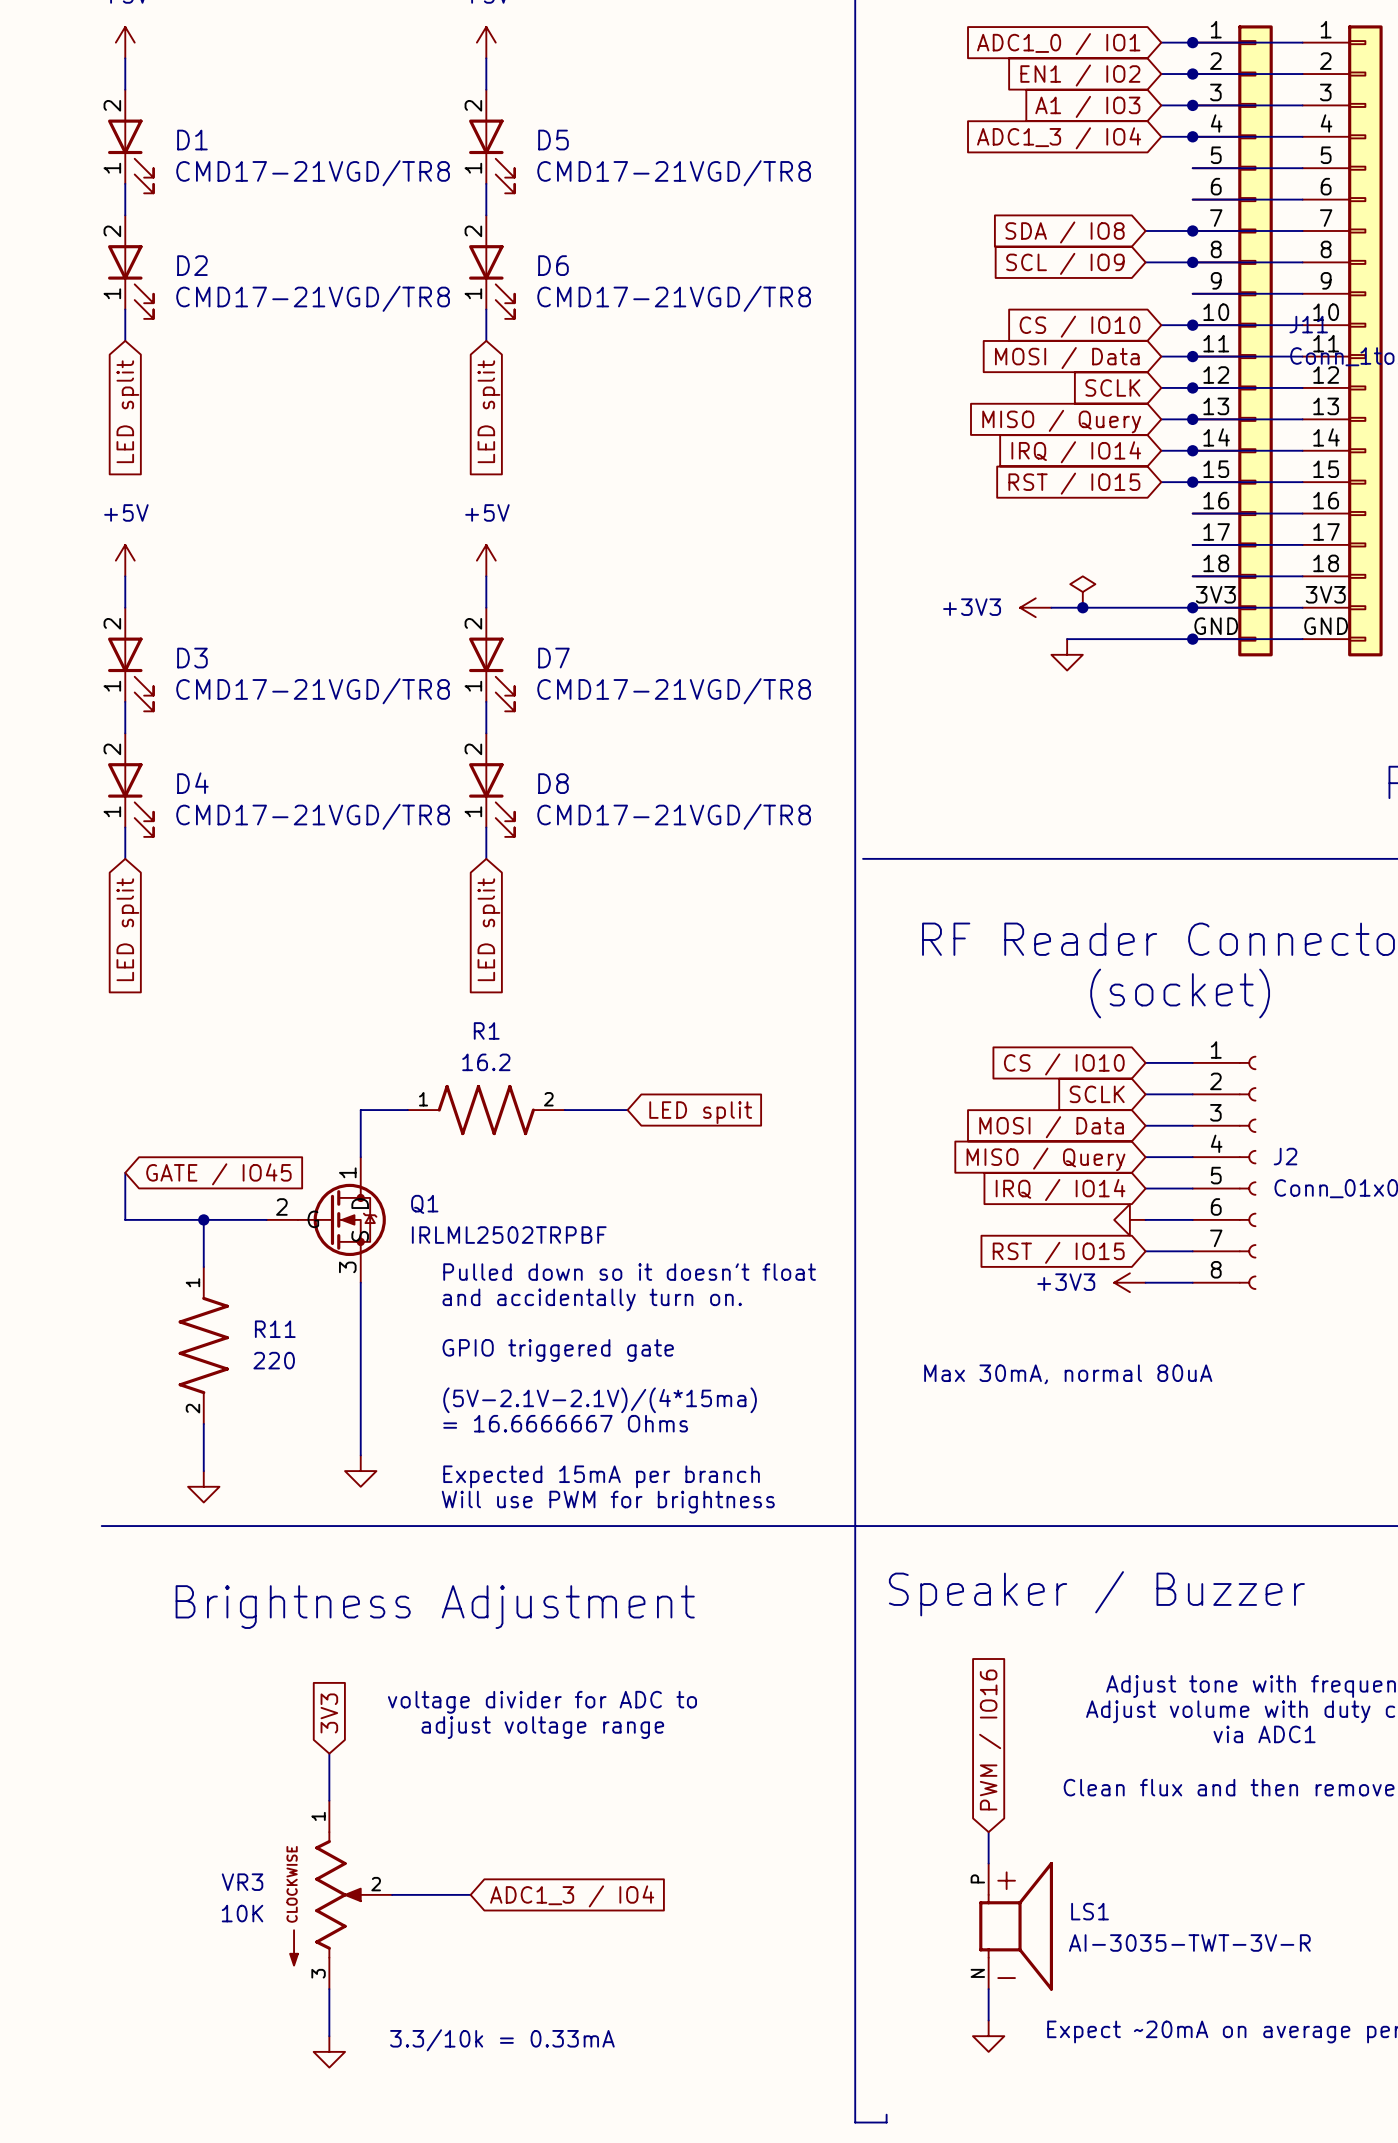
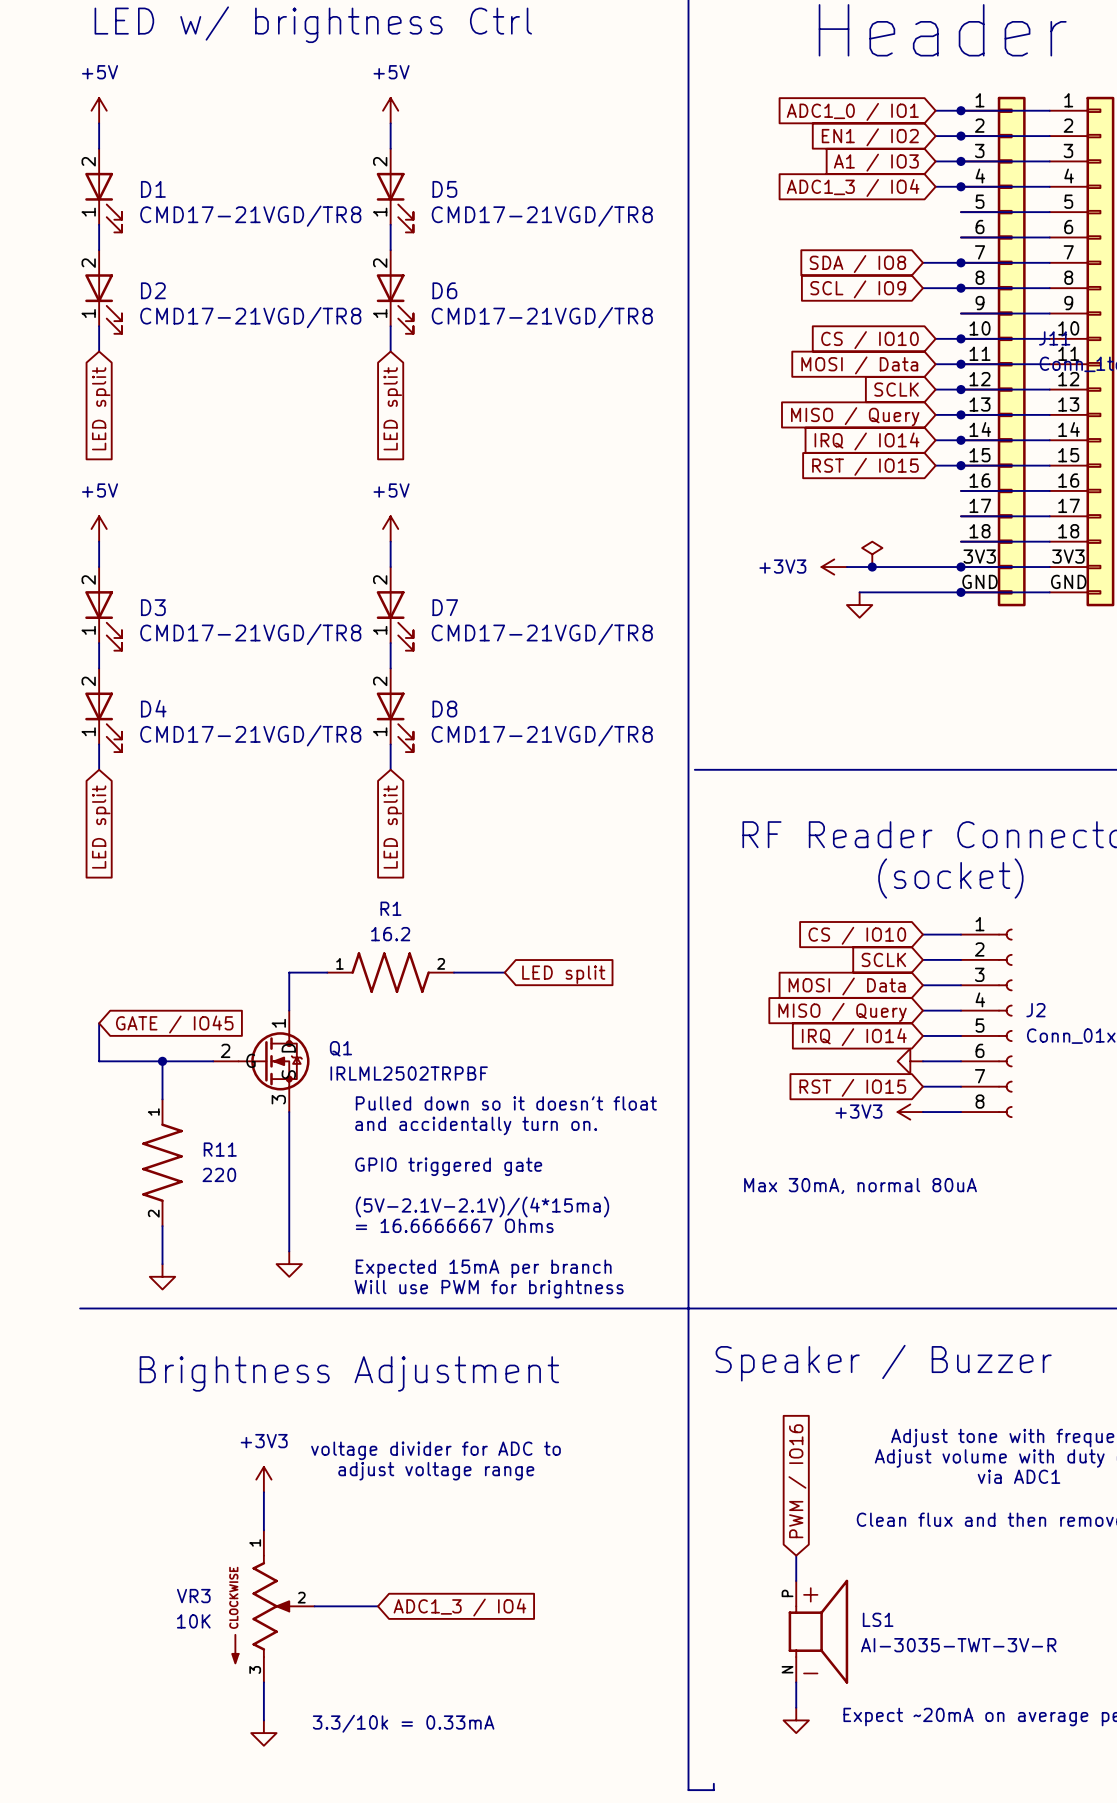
global label: 3V3 (329, 1713) -> none
power symbol: none -> +3V3 (263, 1479)

